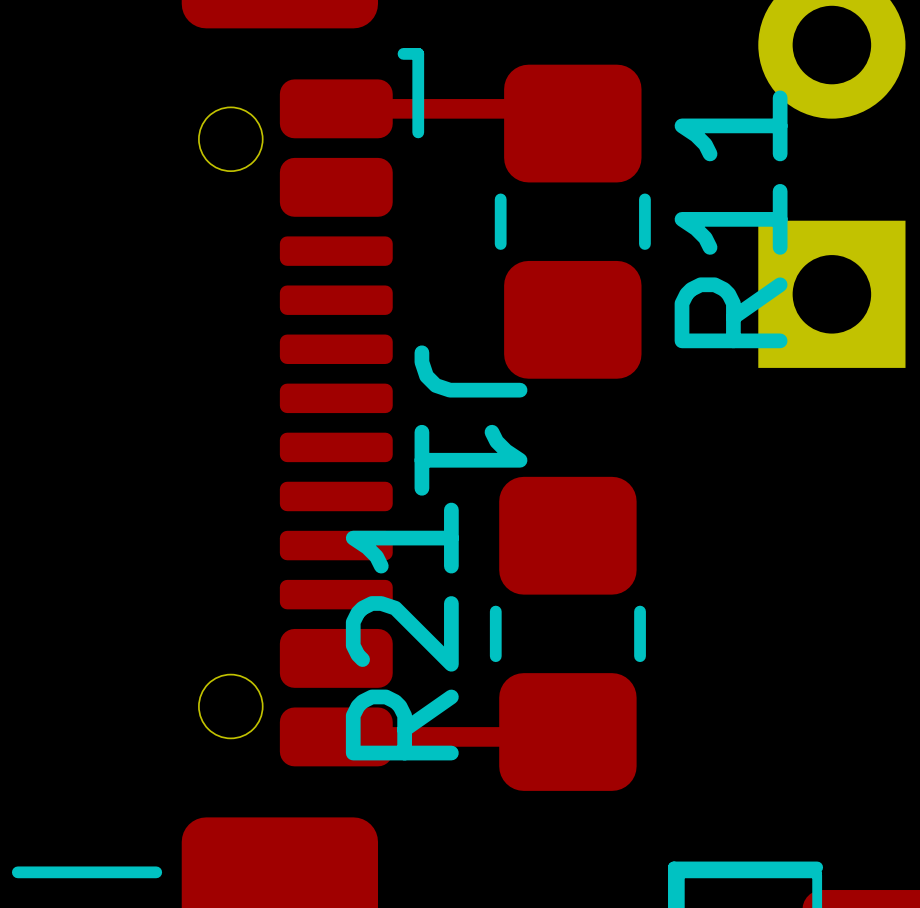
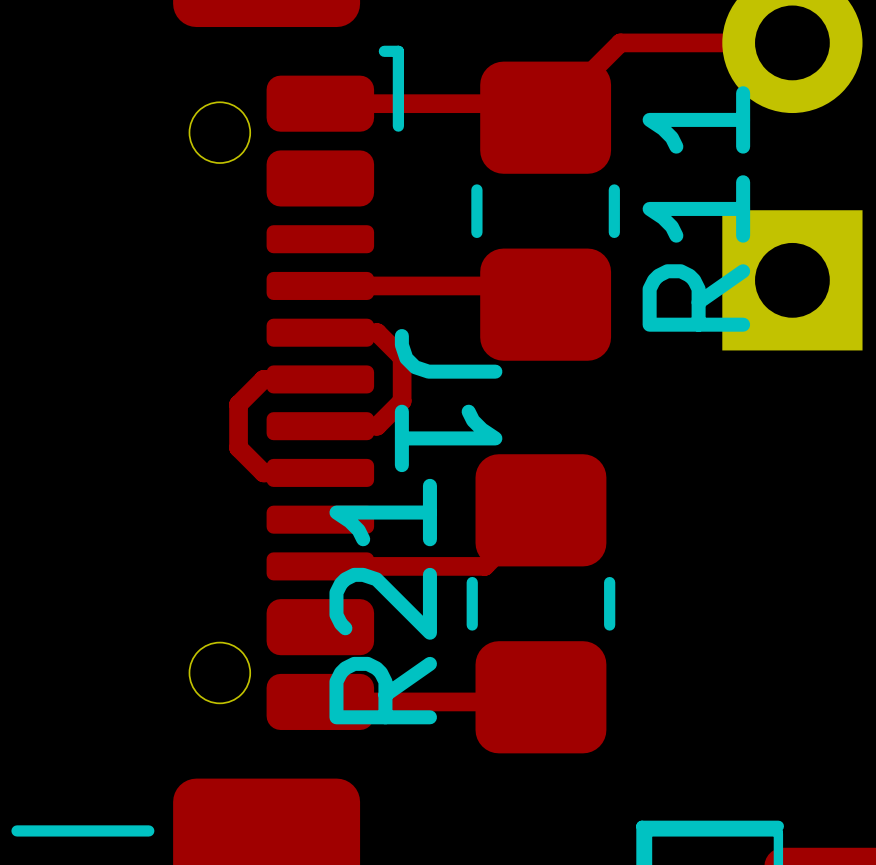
top track: none -> (792, 42) (620, 42) (545, 117)
top track: none -> (320, 285) (526, 285) (545, 304)
top track: none -> (320, 332) (377, 332) (402, 357) (402, 401) (377, 426) (320, 426)
top track: none -> (320, 379) (263, 379) (238, 404) (238, 447) (263, 472) (320, 472)
top track: none -> (540, 510) (484, 566) (320, 566)

